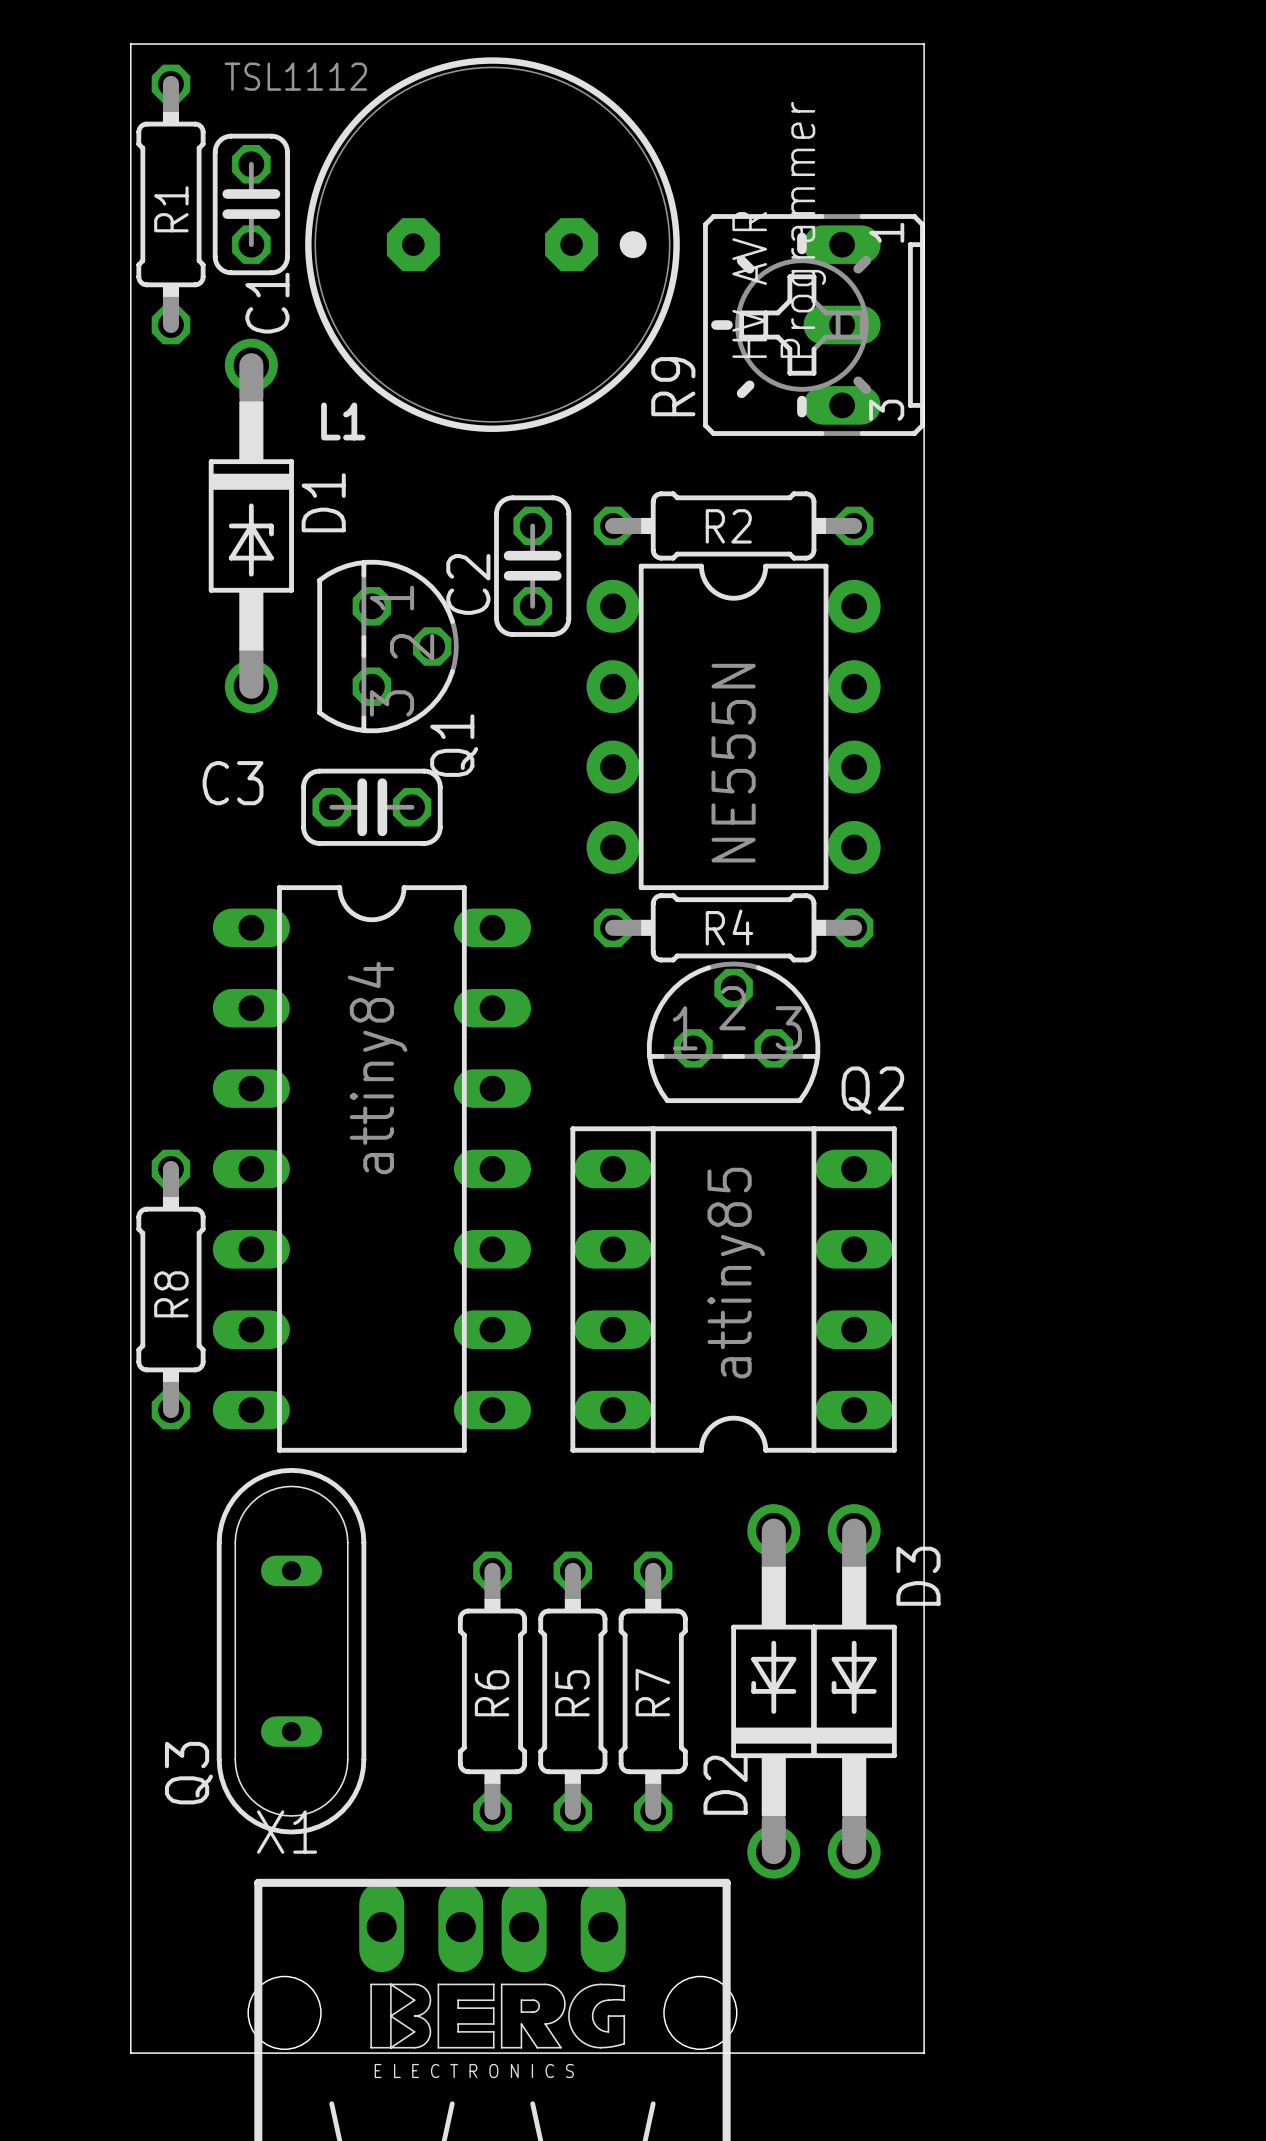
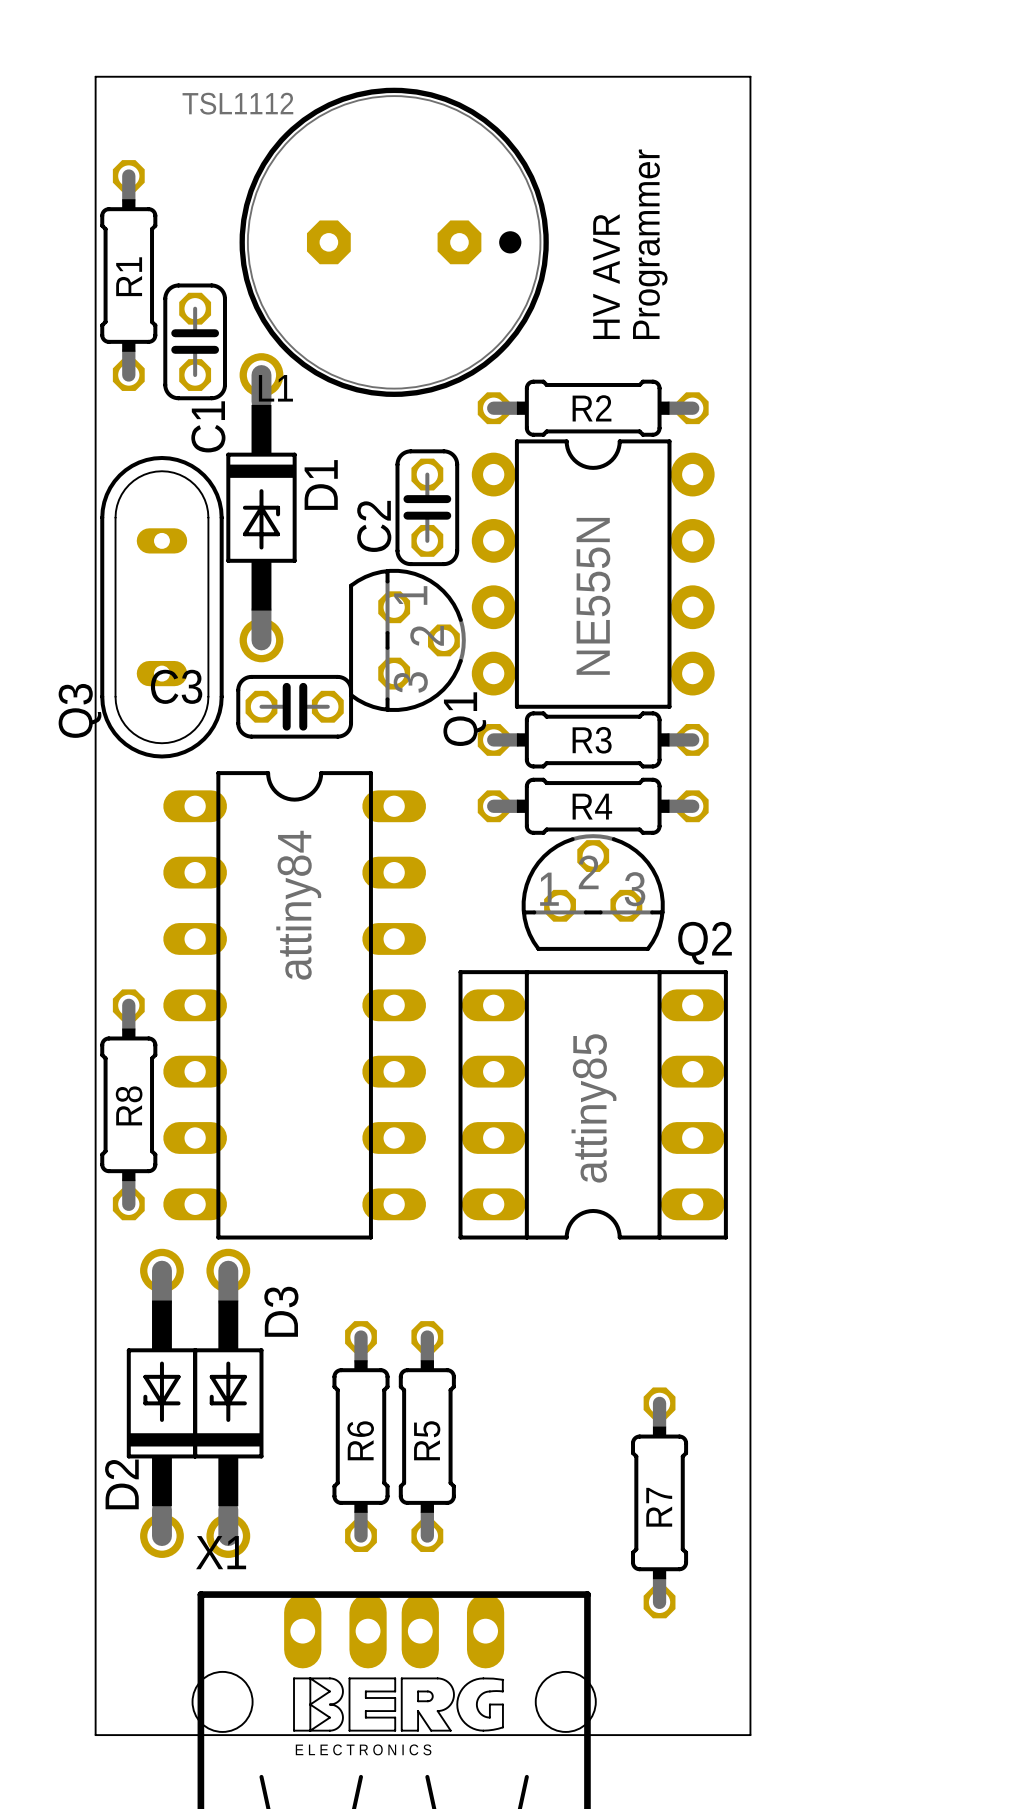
R1 position: (170, 204) -> (128, 275)
C1 position: (251, 204) -> (195, 341)
R9: (813, 325) -> none
D1 position: (251, 525) -> (261, 507)
R2 position: (733, 525) -> (593, 408)
Q1 position: (387, 646) -> (407, 640)
part position: (733, 726) -> (593, 574)
R3: none -> (593, 739)
Q3 position: (291, 1651) -> (161, 607)
R6 position: (492, 1691) -> (361, 1436)
R5 position: (572, 1691) -> (427, 1436)
R7 position: (653, 1691) -> (659, 1502)
D2 position: (773, 1691) -> (161, 1403)
D3 position: (854, 1691) -> (228, 1403)

